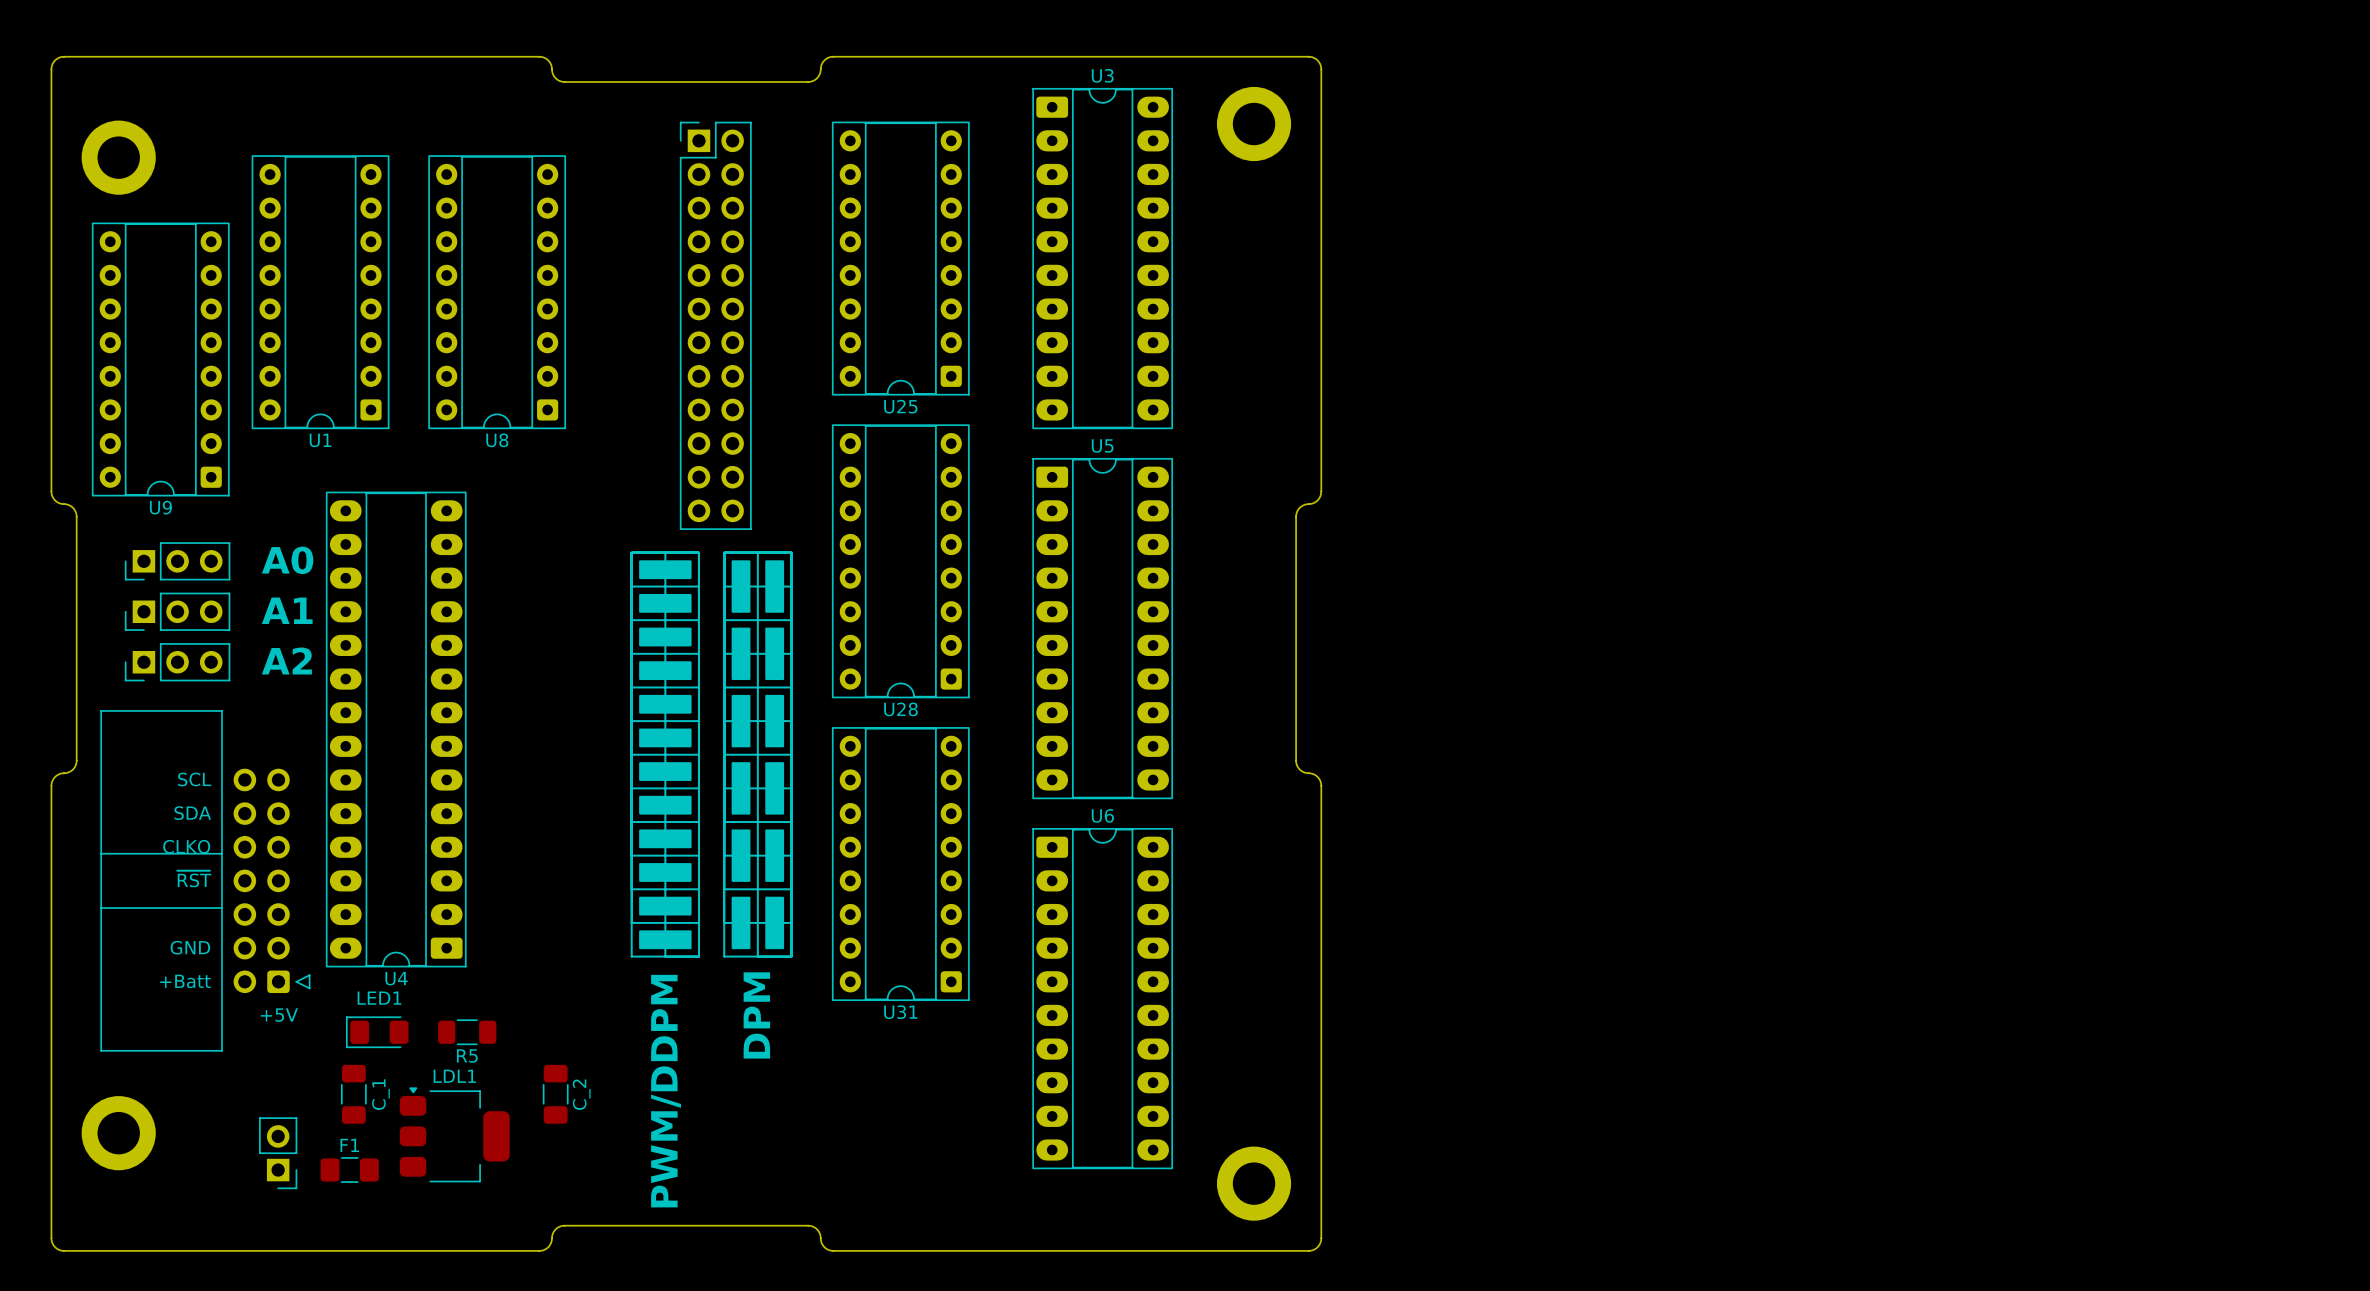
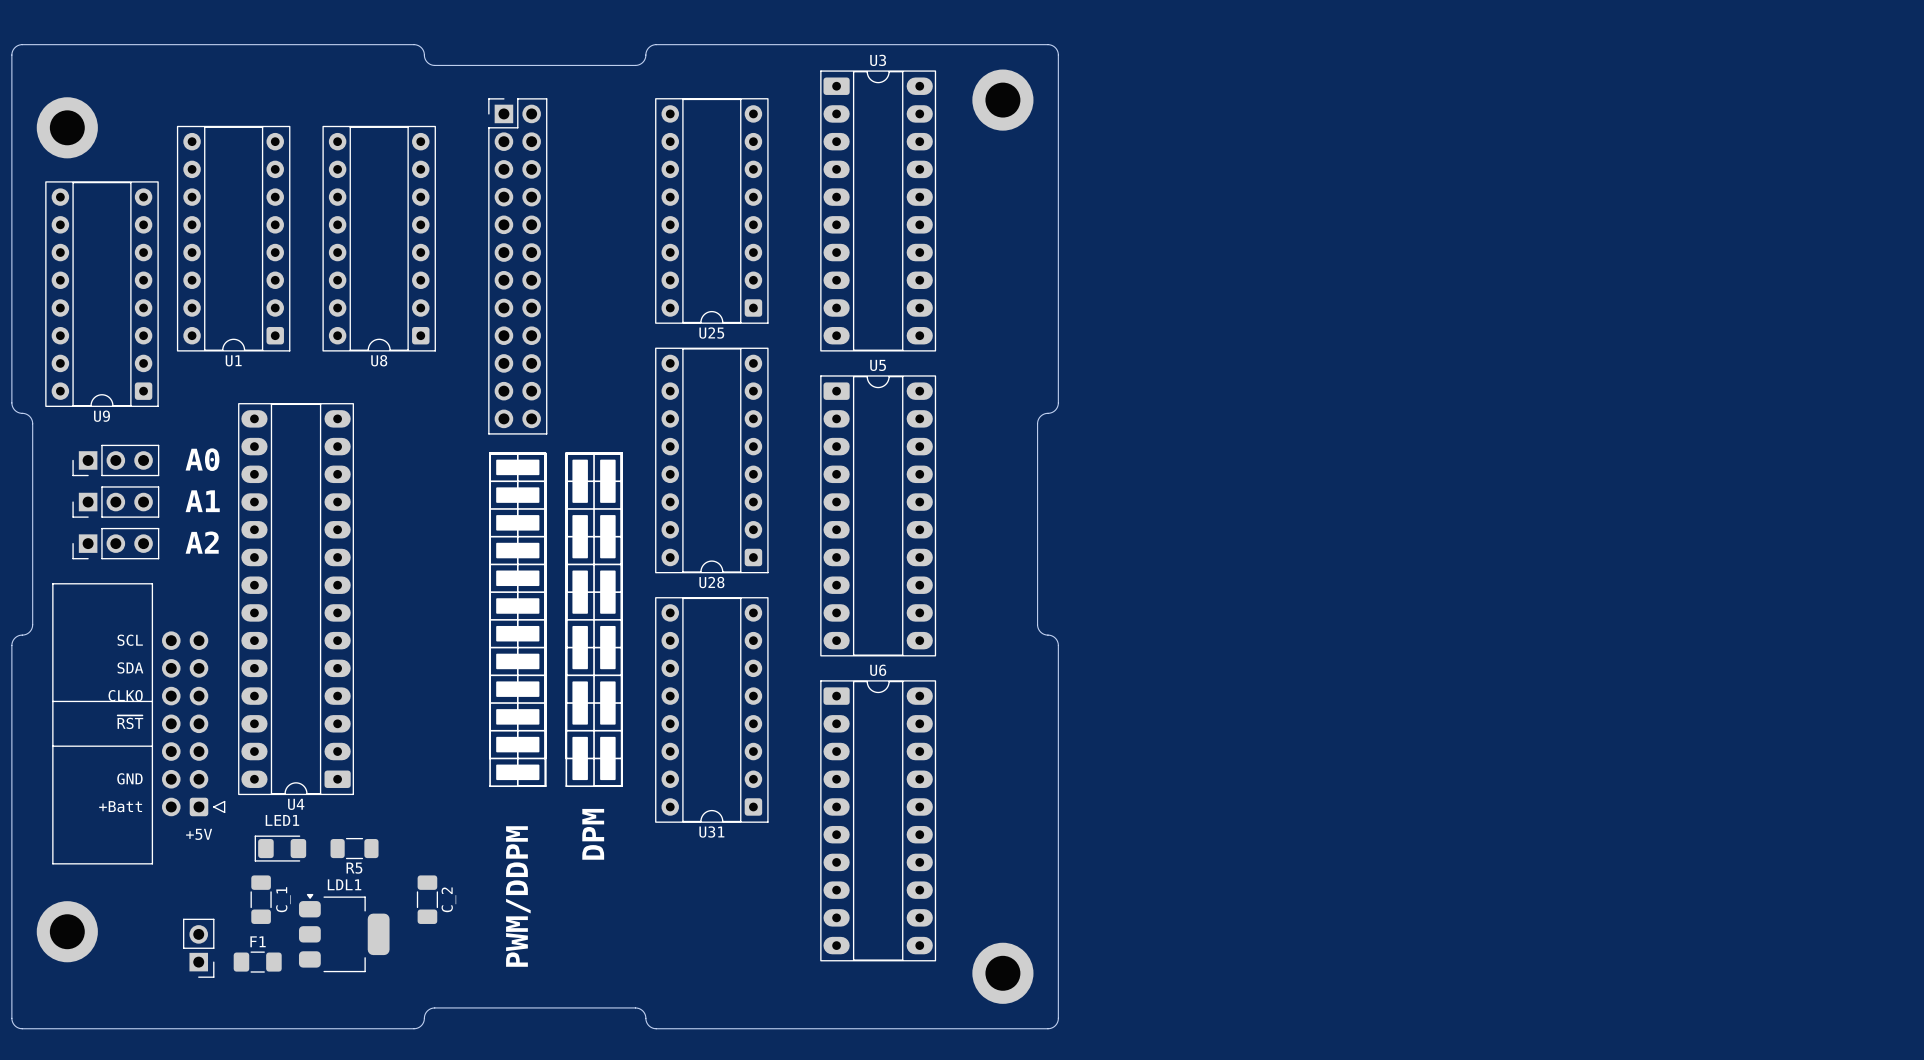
part position: (715, 325) -> (517, 266)

